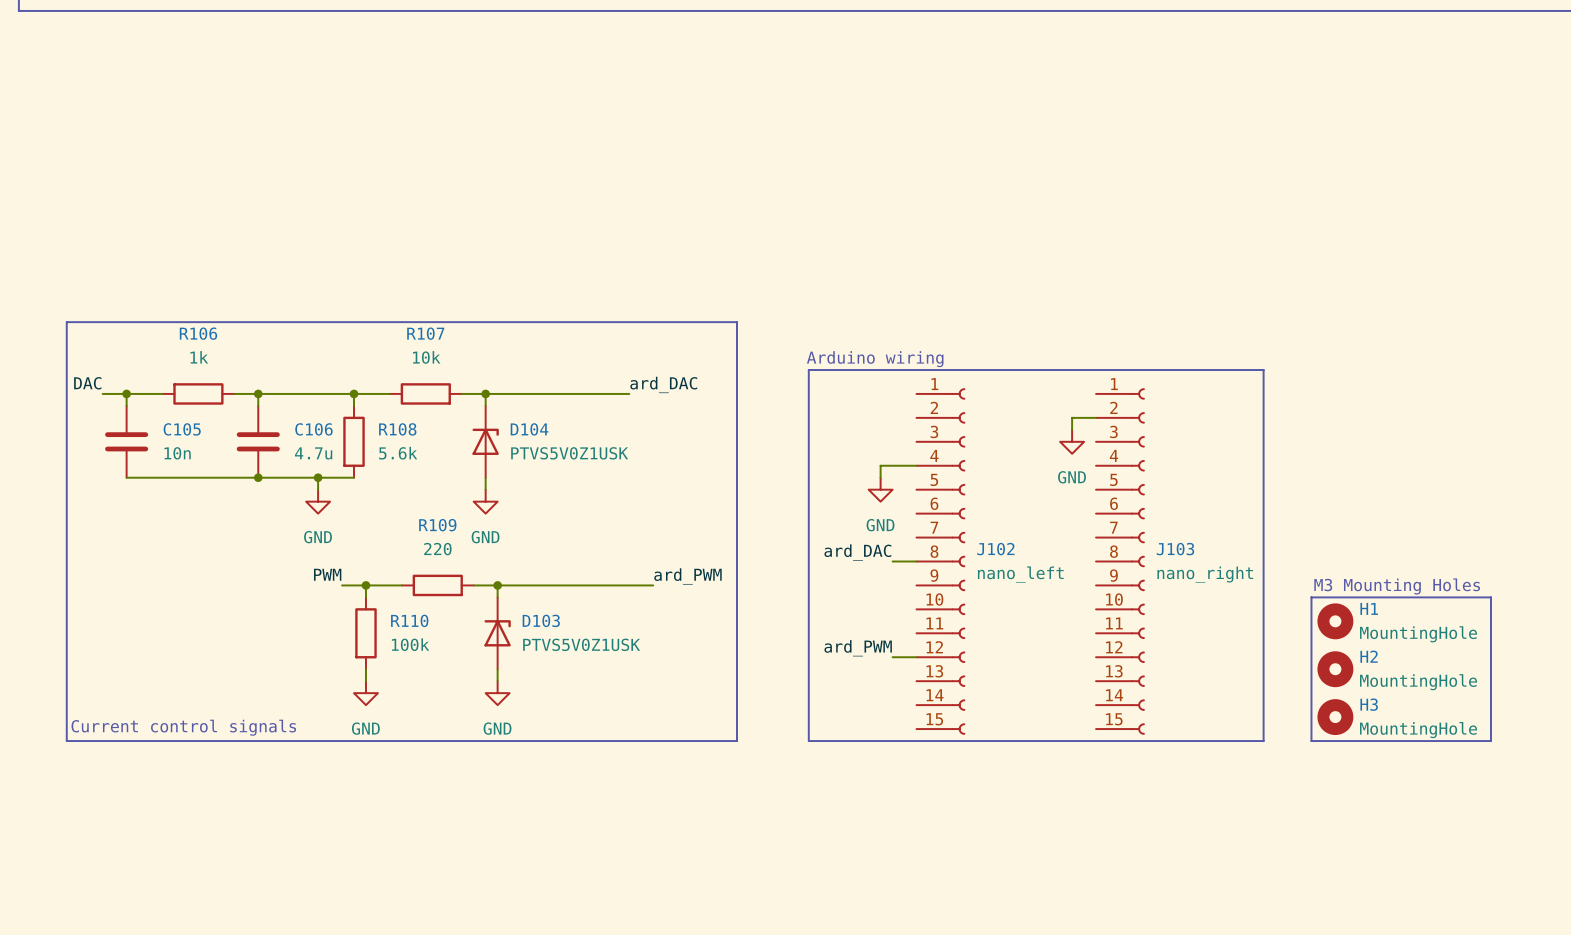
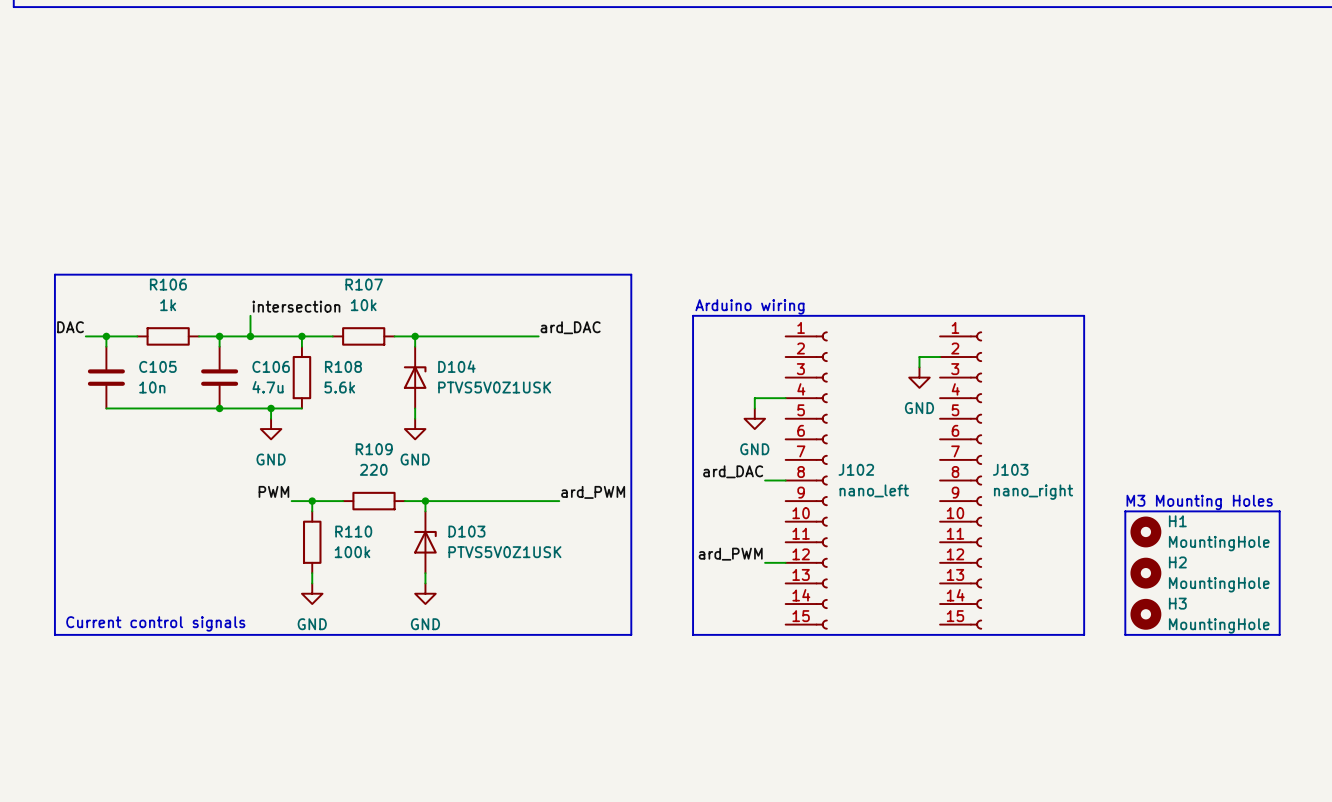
label: none -> intersection (296, 306)
wire: none -> (250, 315) (250, 336)
junction: none -> (250, 336)

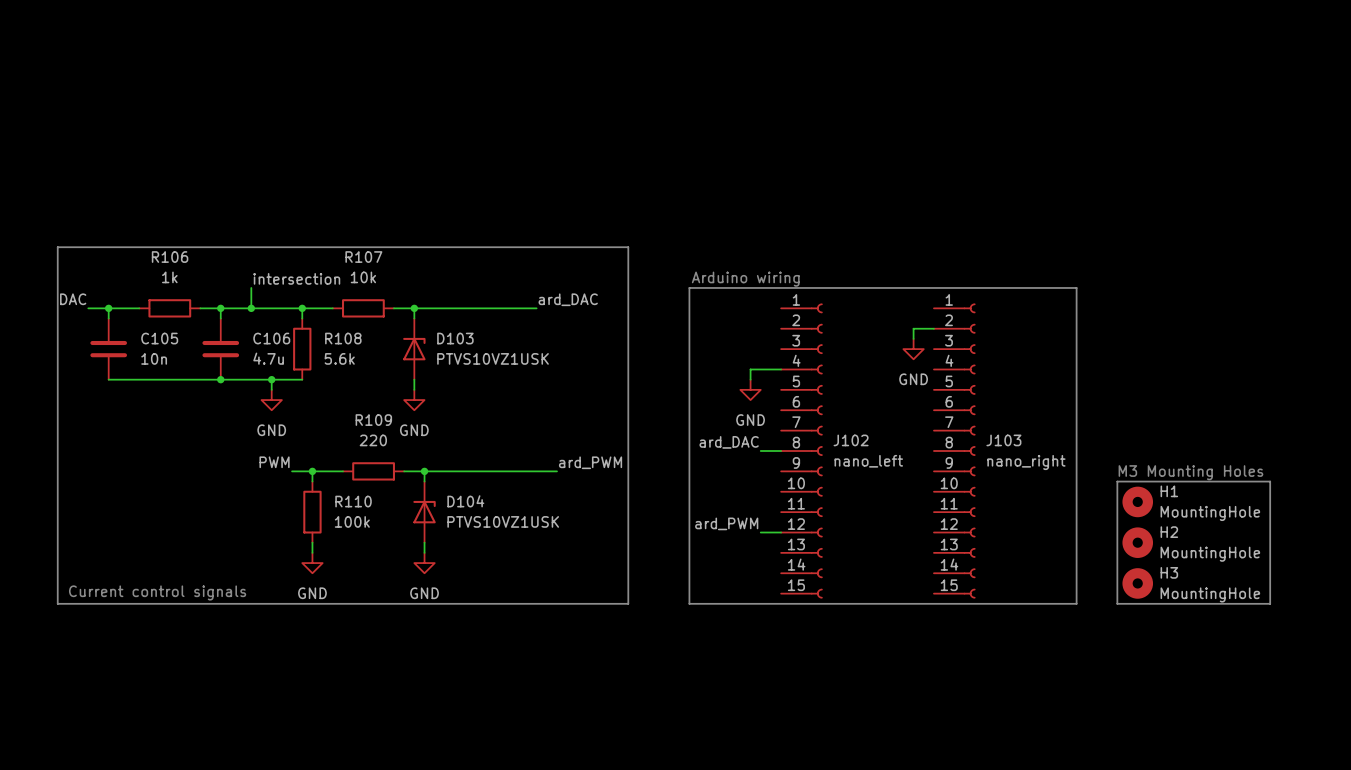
D104 name: D104 (456, 366) -> D103 (455, 338)
D104 value: PTVS5V0Z1USK (494, 387) -> PTVS10VZ1USK (493, 358)
D103 name: D103 (466, 531) -> D104 (465, 501)
D103 value: PTVS5V0Z1USK (504, 552) -> PTVS10VZ1USK (503, 521)

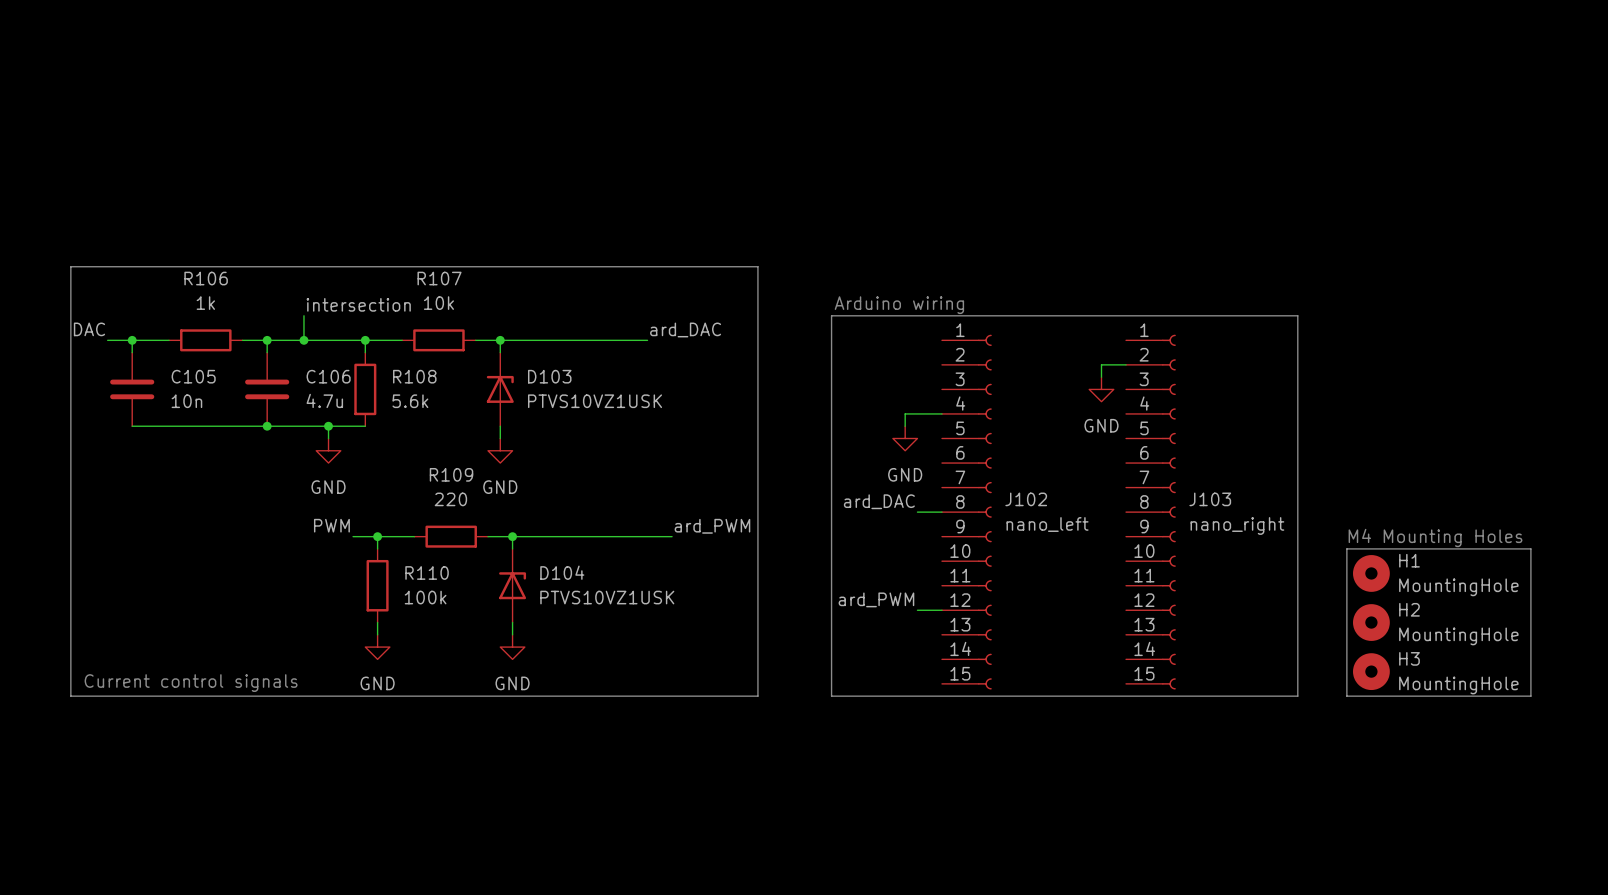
text: M3 Mounting Holes (1190, 472) -> M4 Mounting Holes (1435, 537)

